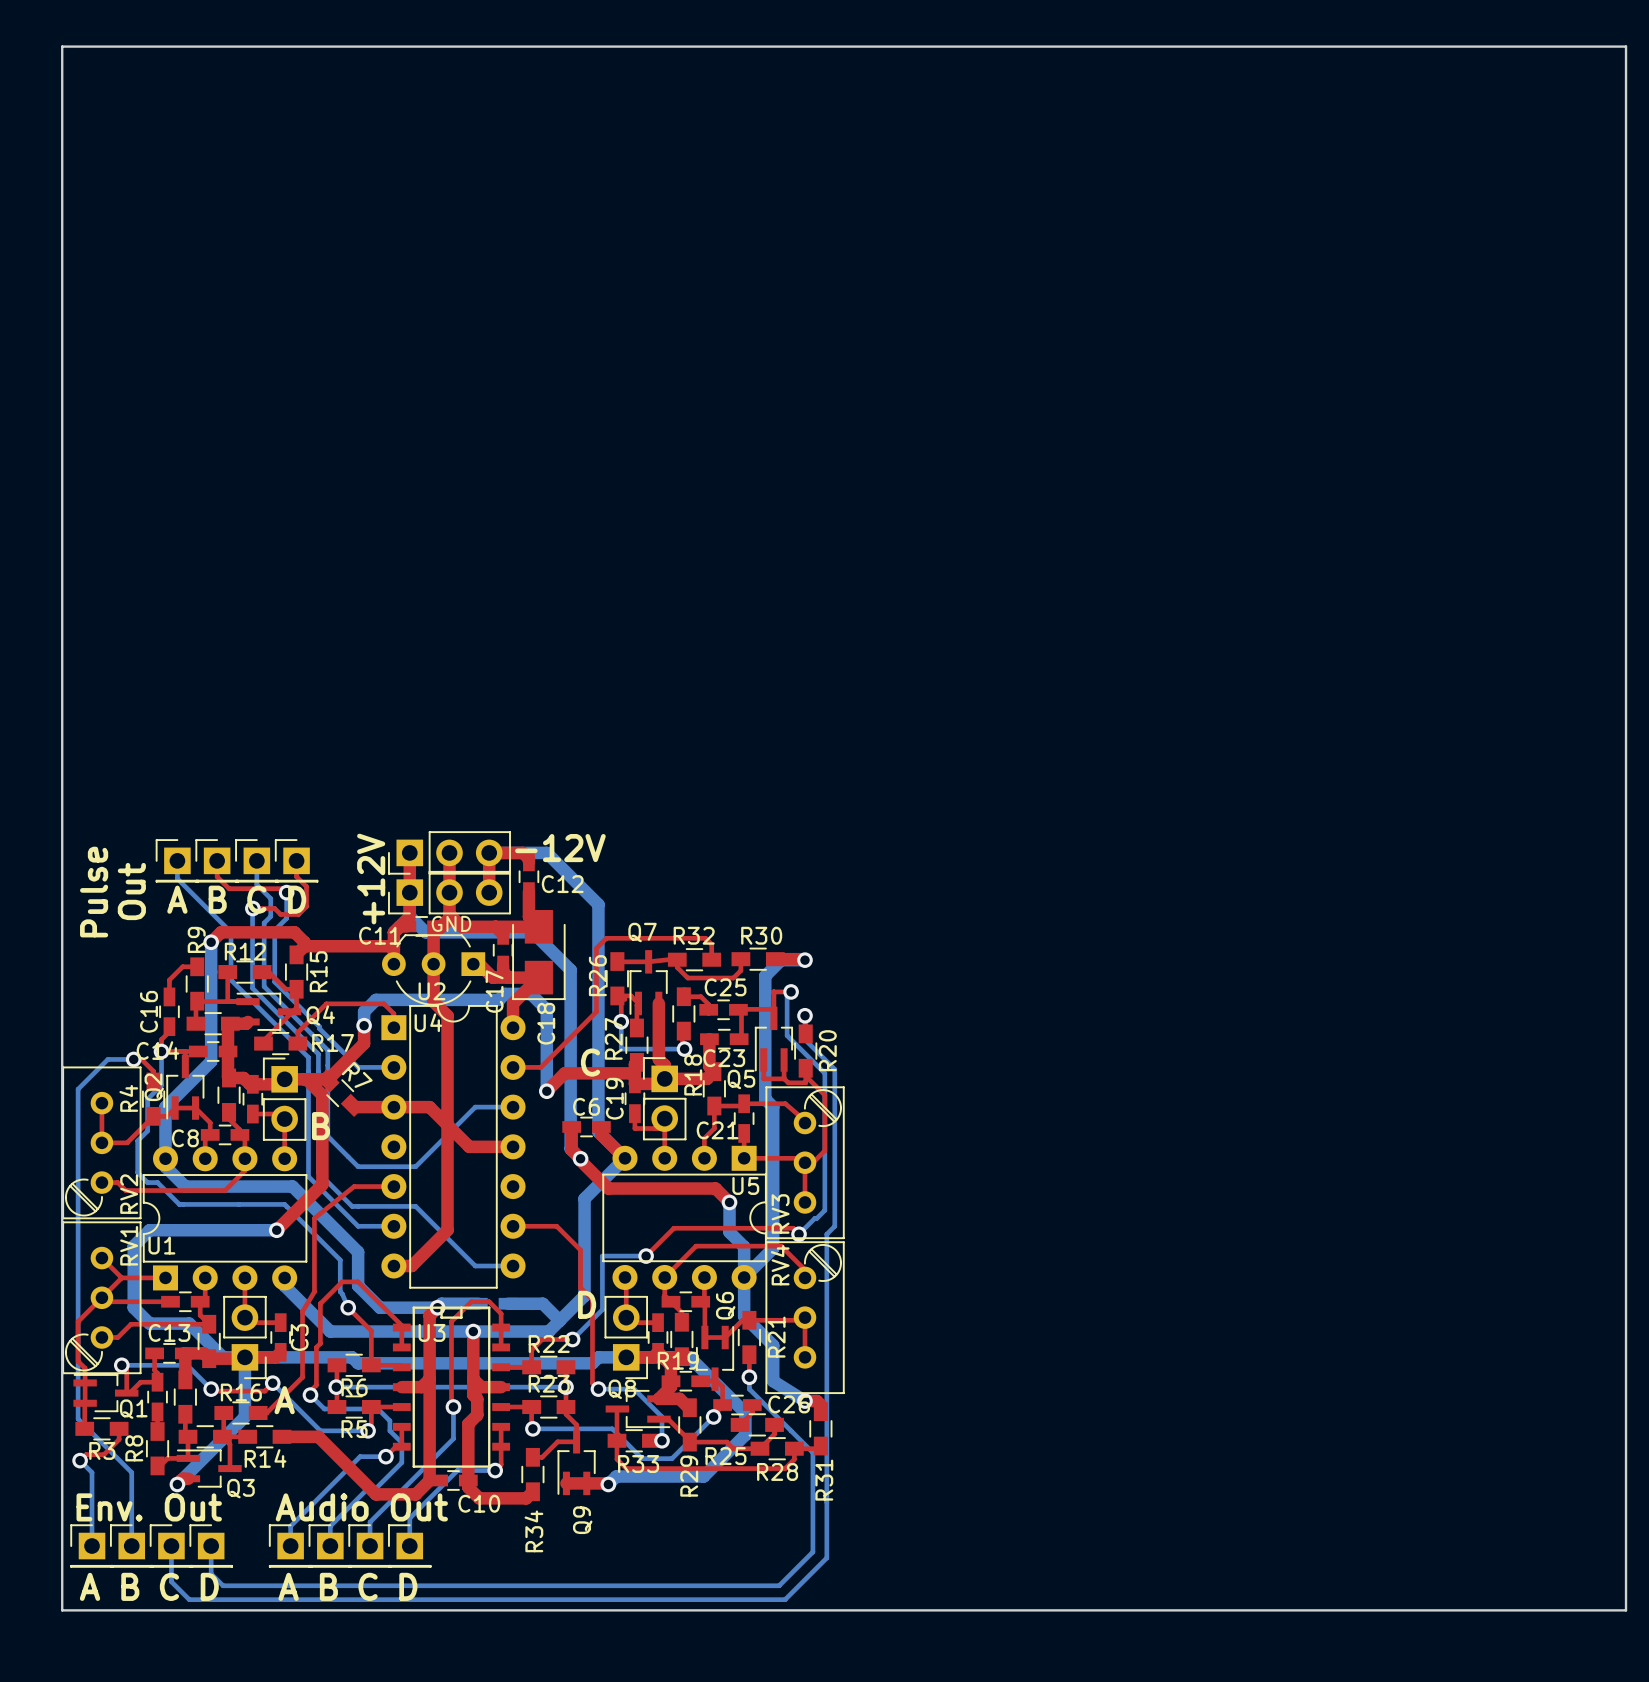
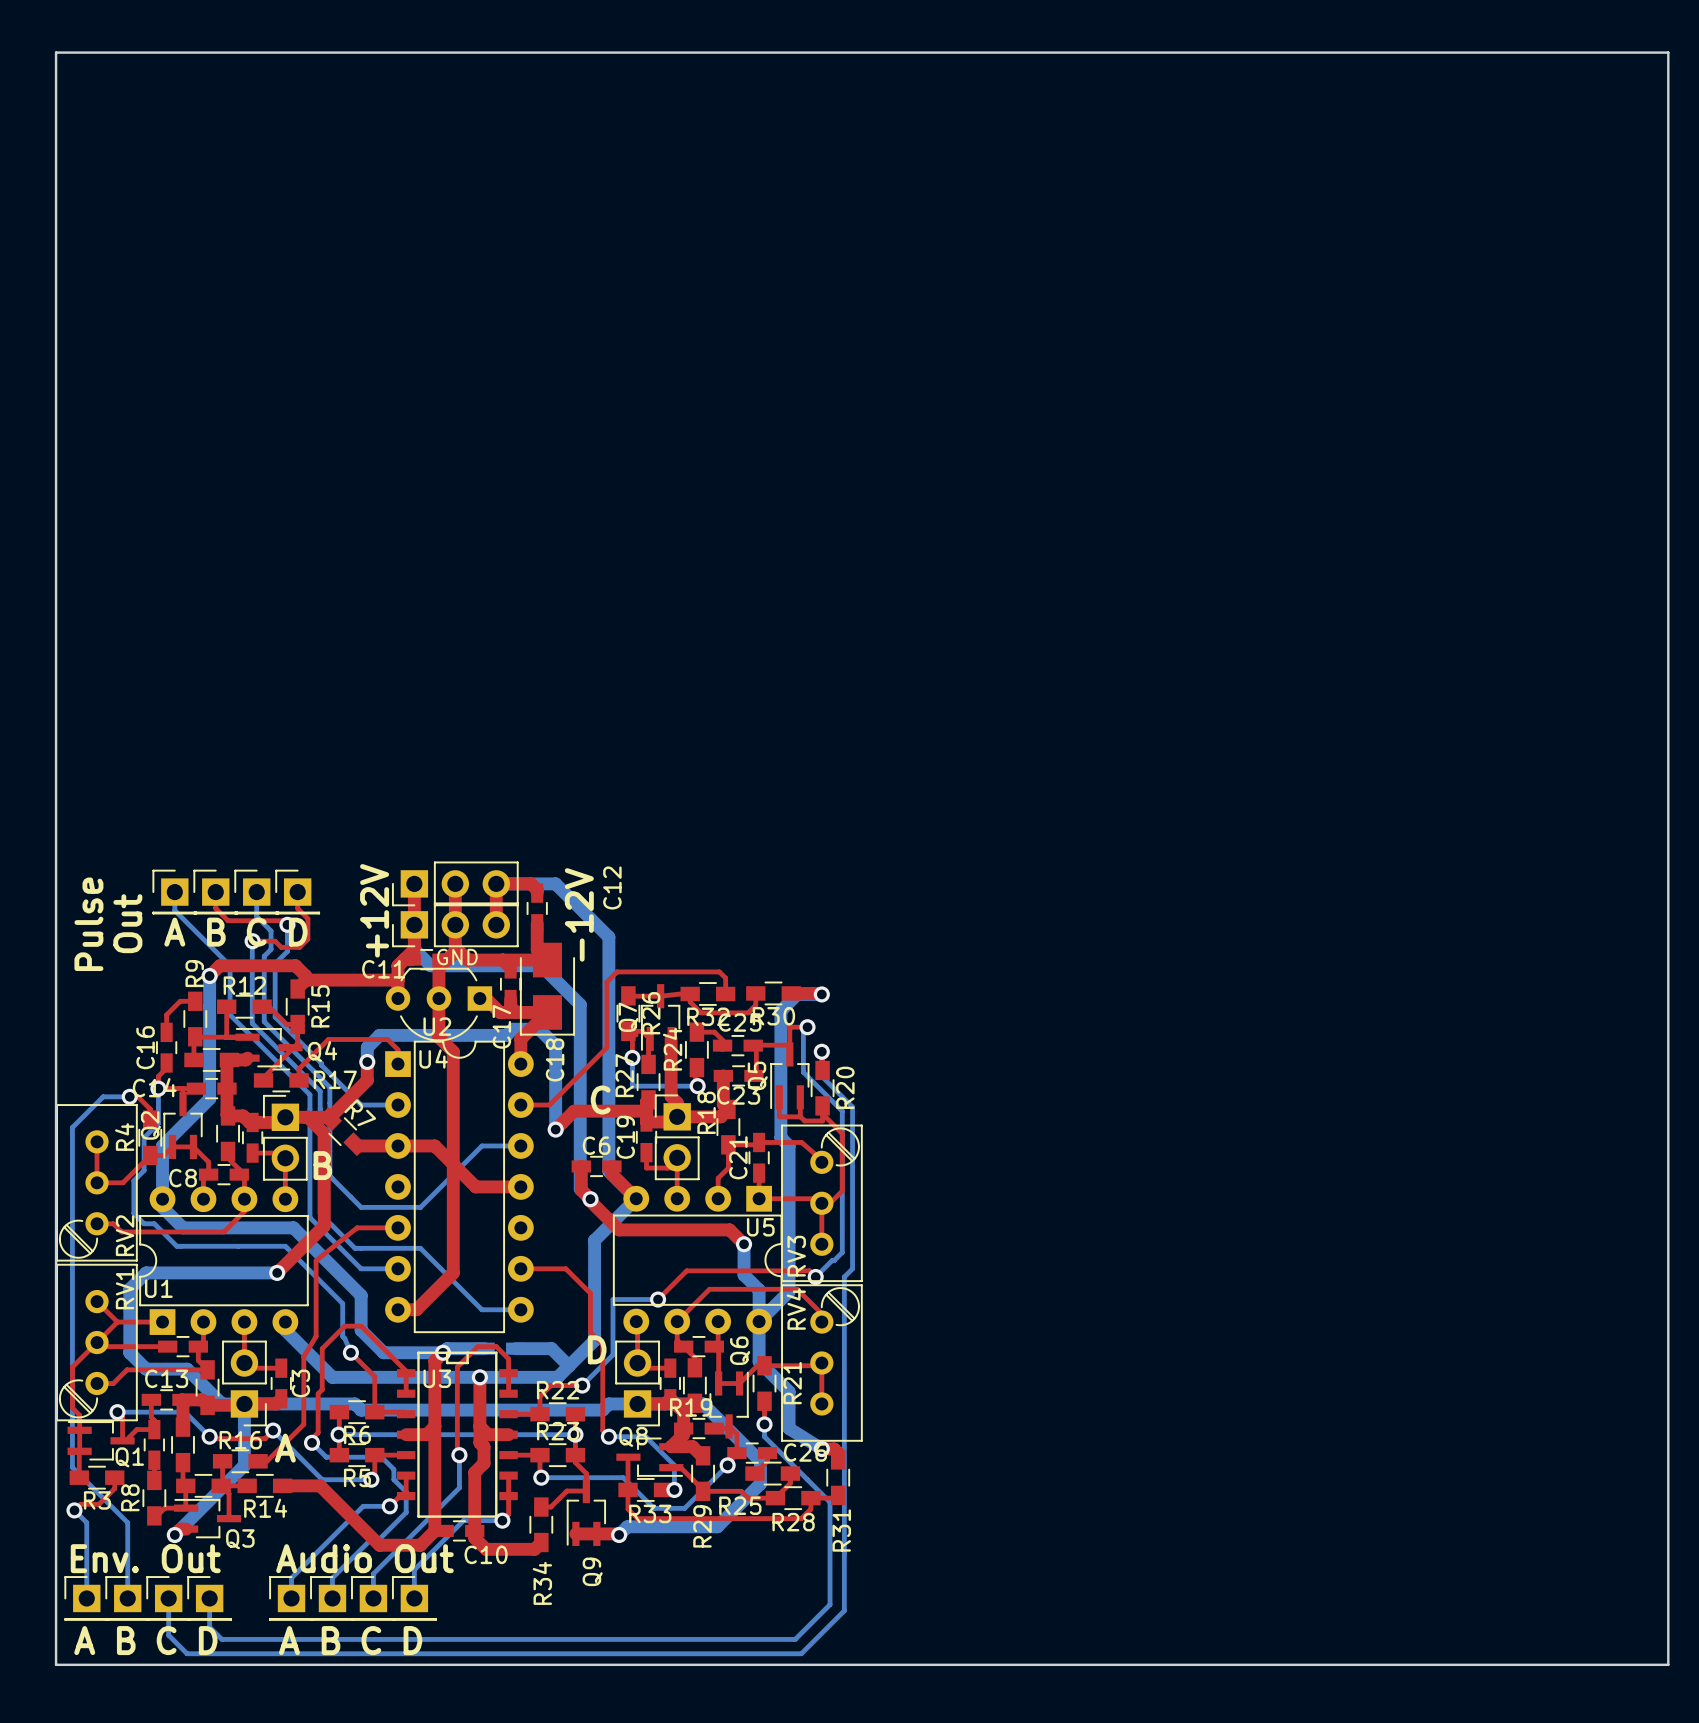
text rotation: 0° (560, 848) -> 90° counterclockwise (579, 914)
C12 name rotation: 0° (562, 884) -> 90° counterclockwise (612, 887)
Q7 name rotation: 0° (642, 932) -> 90° counterclockwise (628, 1017)
Q7 name position: Q7 (642, 932) -> Q7 (628, 1017)
R32 name position: R32 (694, 935) -> R32 (708, 1016)
R30 name position: R30 (761, 935) -> R30 (773, 1016)
R26 name position: R26 (597, 975) -> R26 (651, 1013)
R24 name: none -> R24 (672, 1049)
Q5 name rotation: 0° (741, 1079) -> 90° counterclockwise (757, 1075)
C21 name rotation: 0° (717, 1130) -> 90° counterclockwise (738, 1157)

